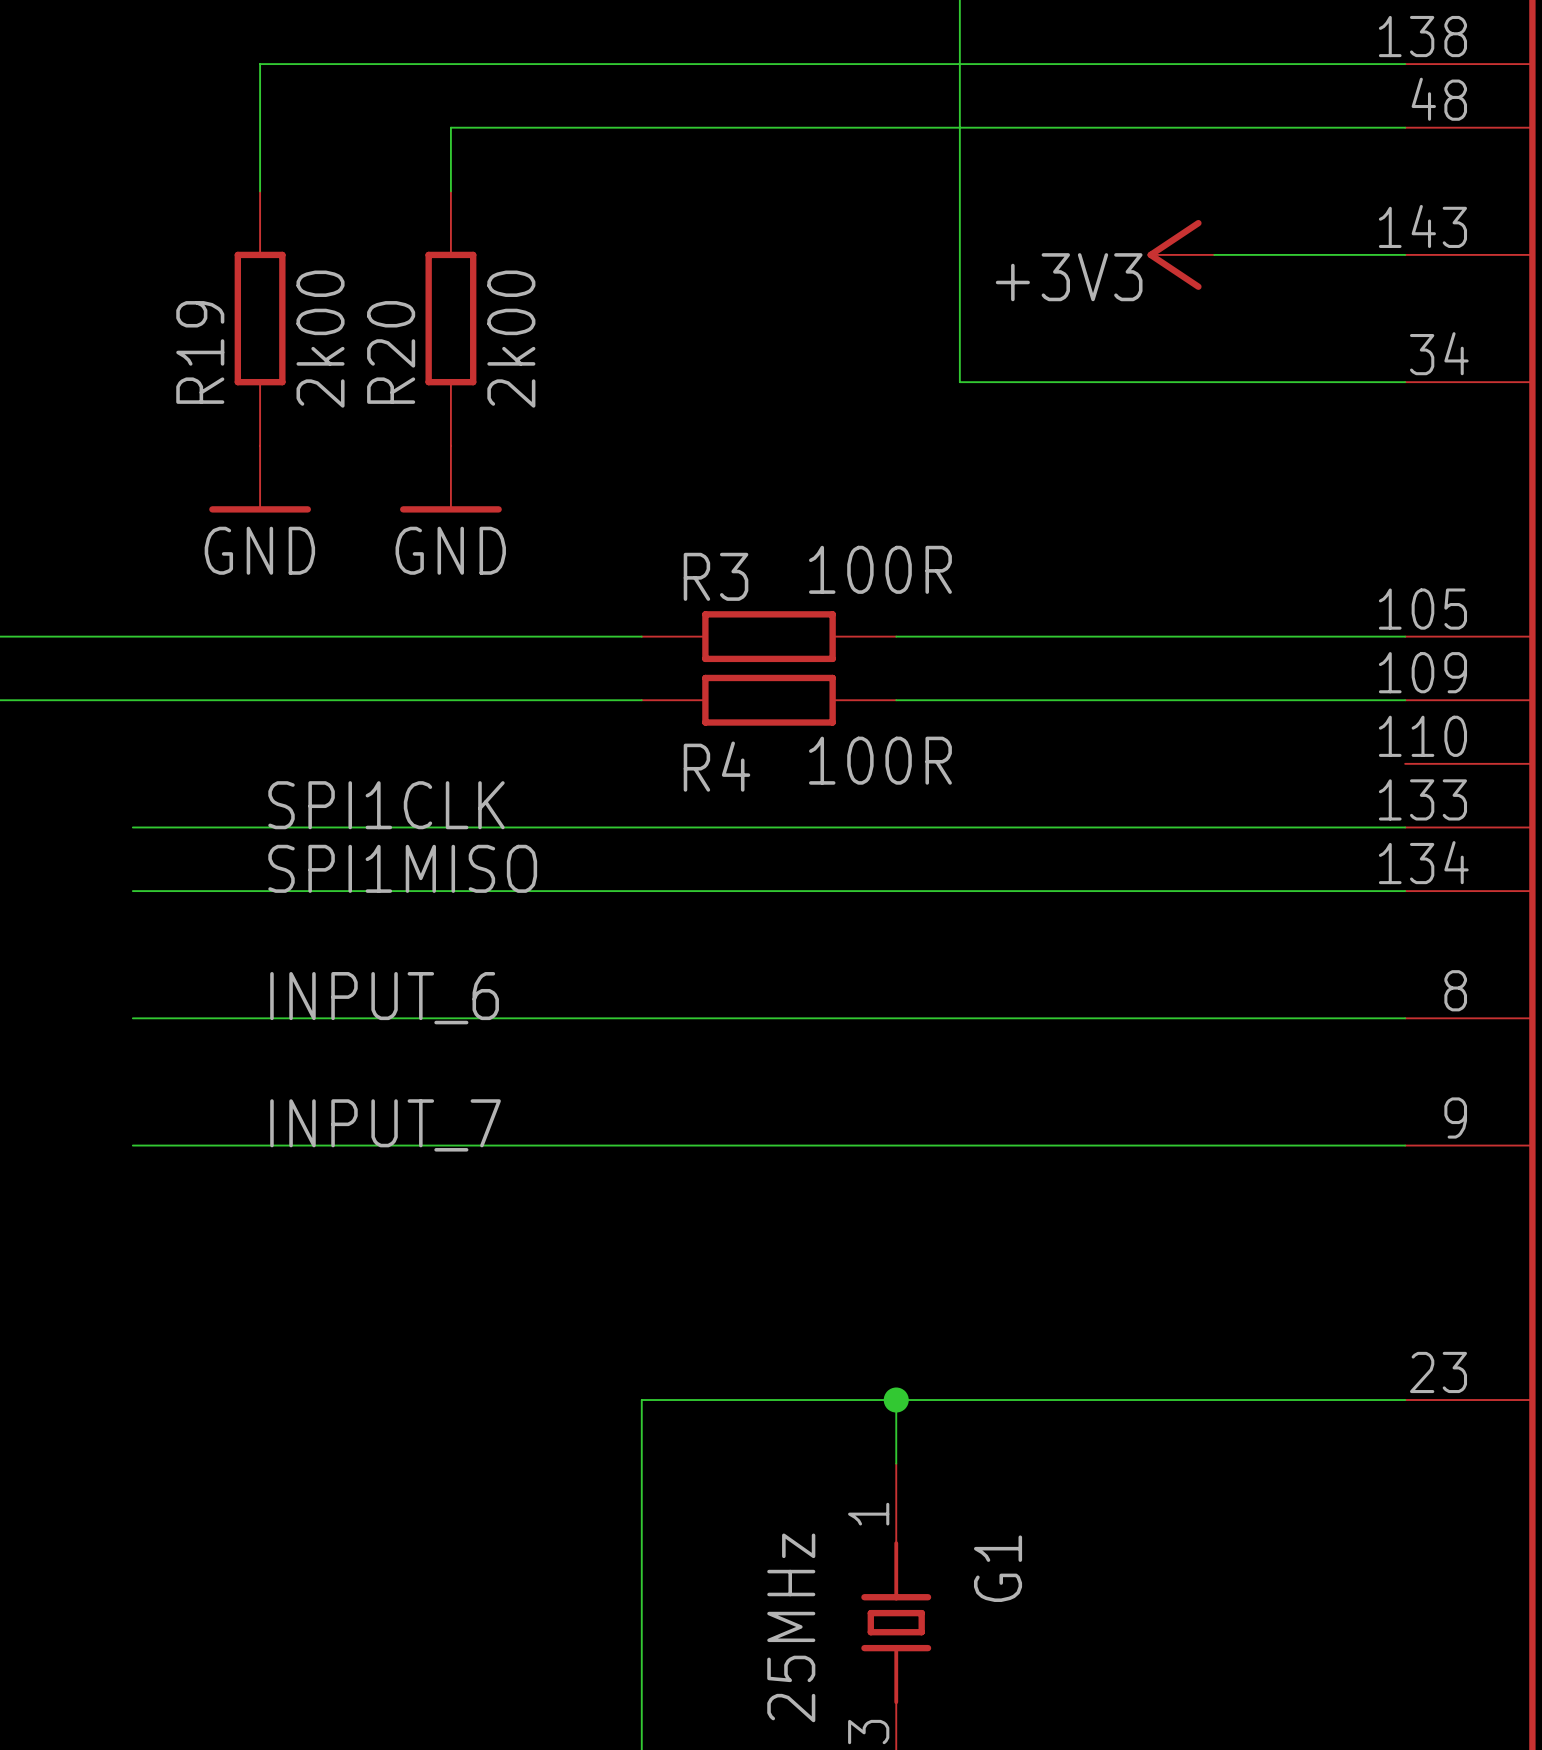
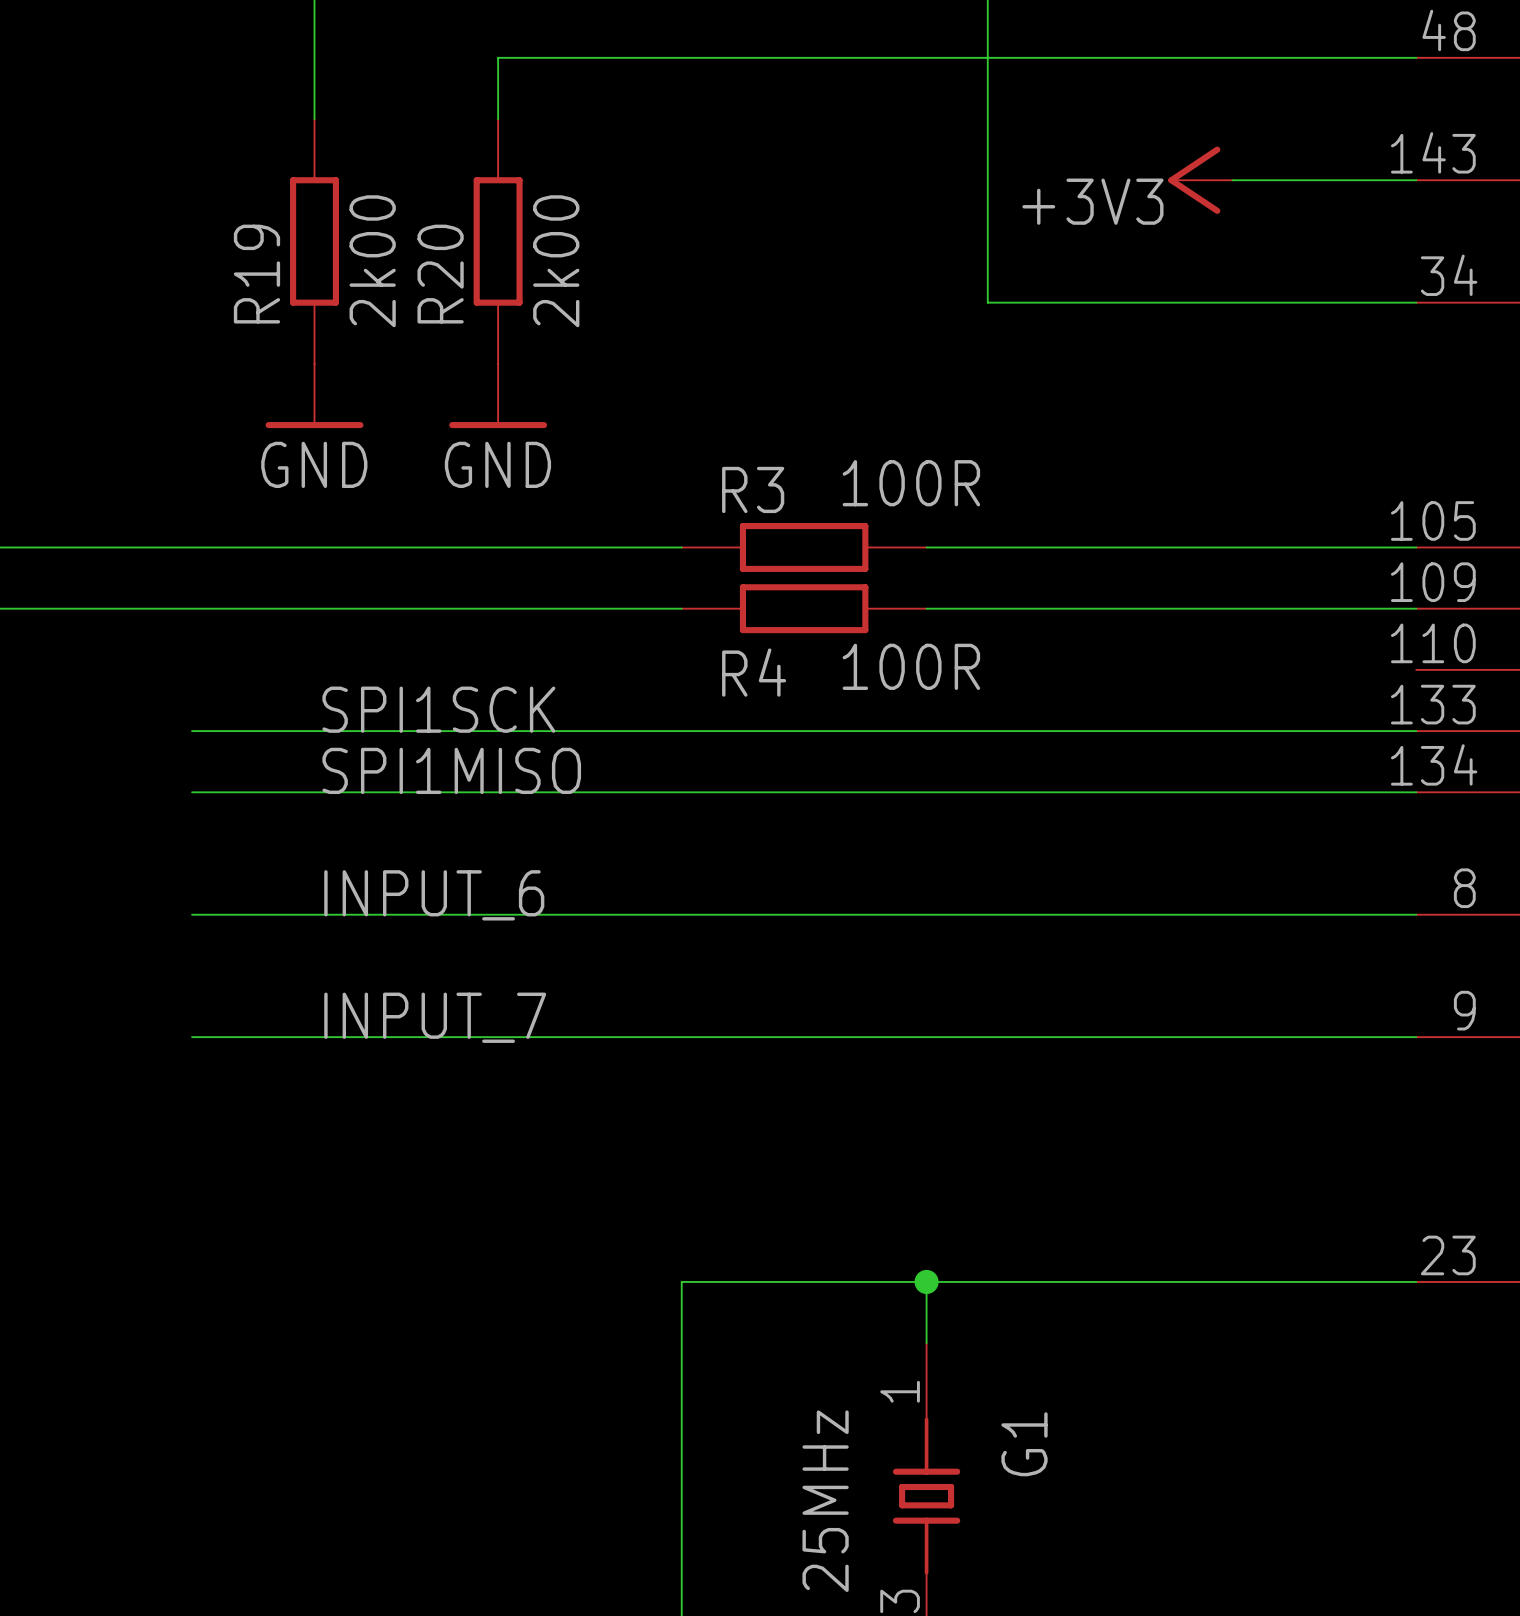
label: SPI1CLK (386, 805) -> SPI1SCK (438, 709)

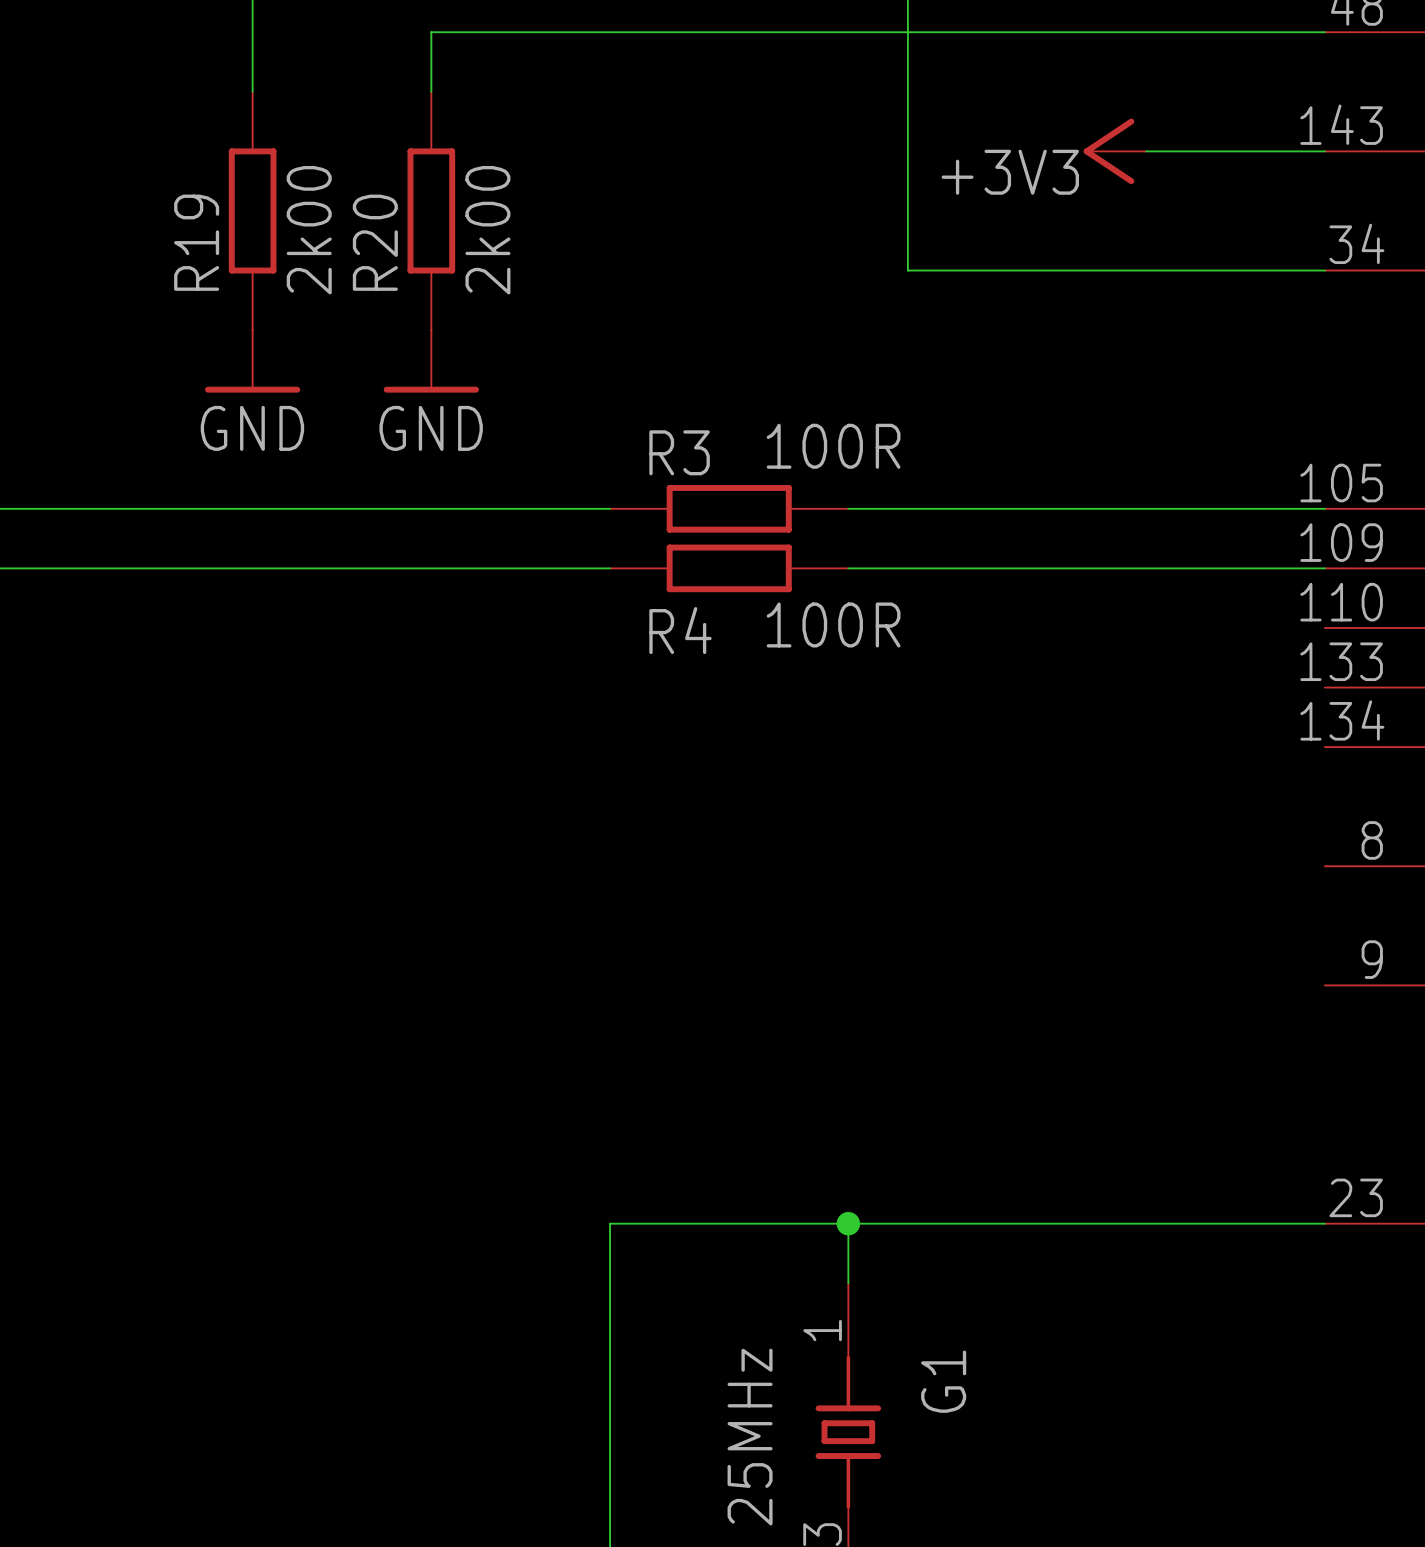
label: SPI1SCK (438, 709) -> none
wire: (192, 731) (1416, 731) -> none
label: SPI1MISO (451, 770) -> none
wire: (192, 792) (1416, 792) -> none
label: INPUT_6 (434, 895) -> none
wire: (192, 914) (1416, 914) -> none
label: INPUT_7 (435, 1017) -> none
wire: (192, 1037) (1416, 1037) -> none

